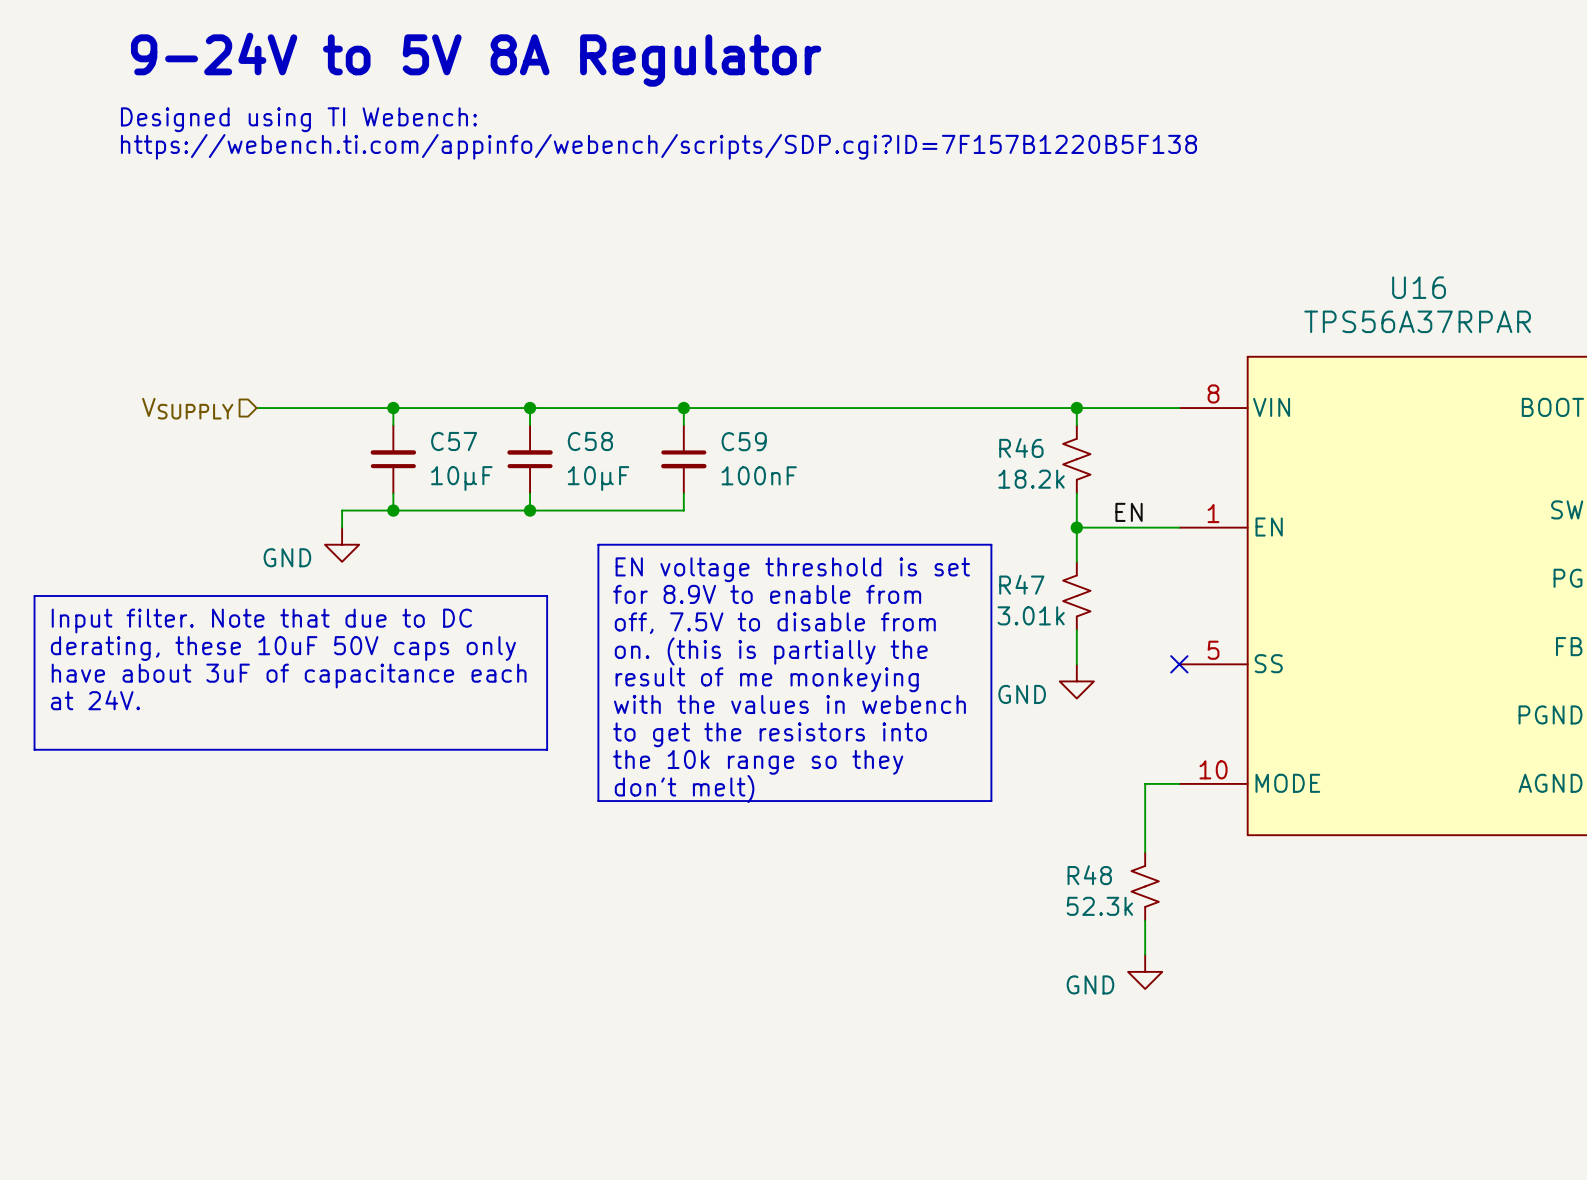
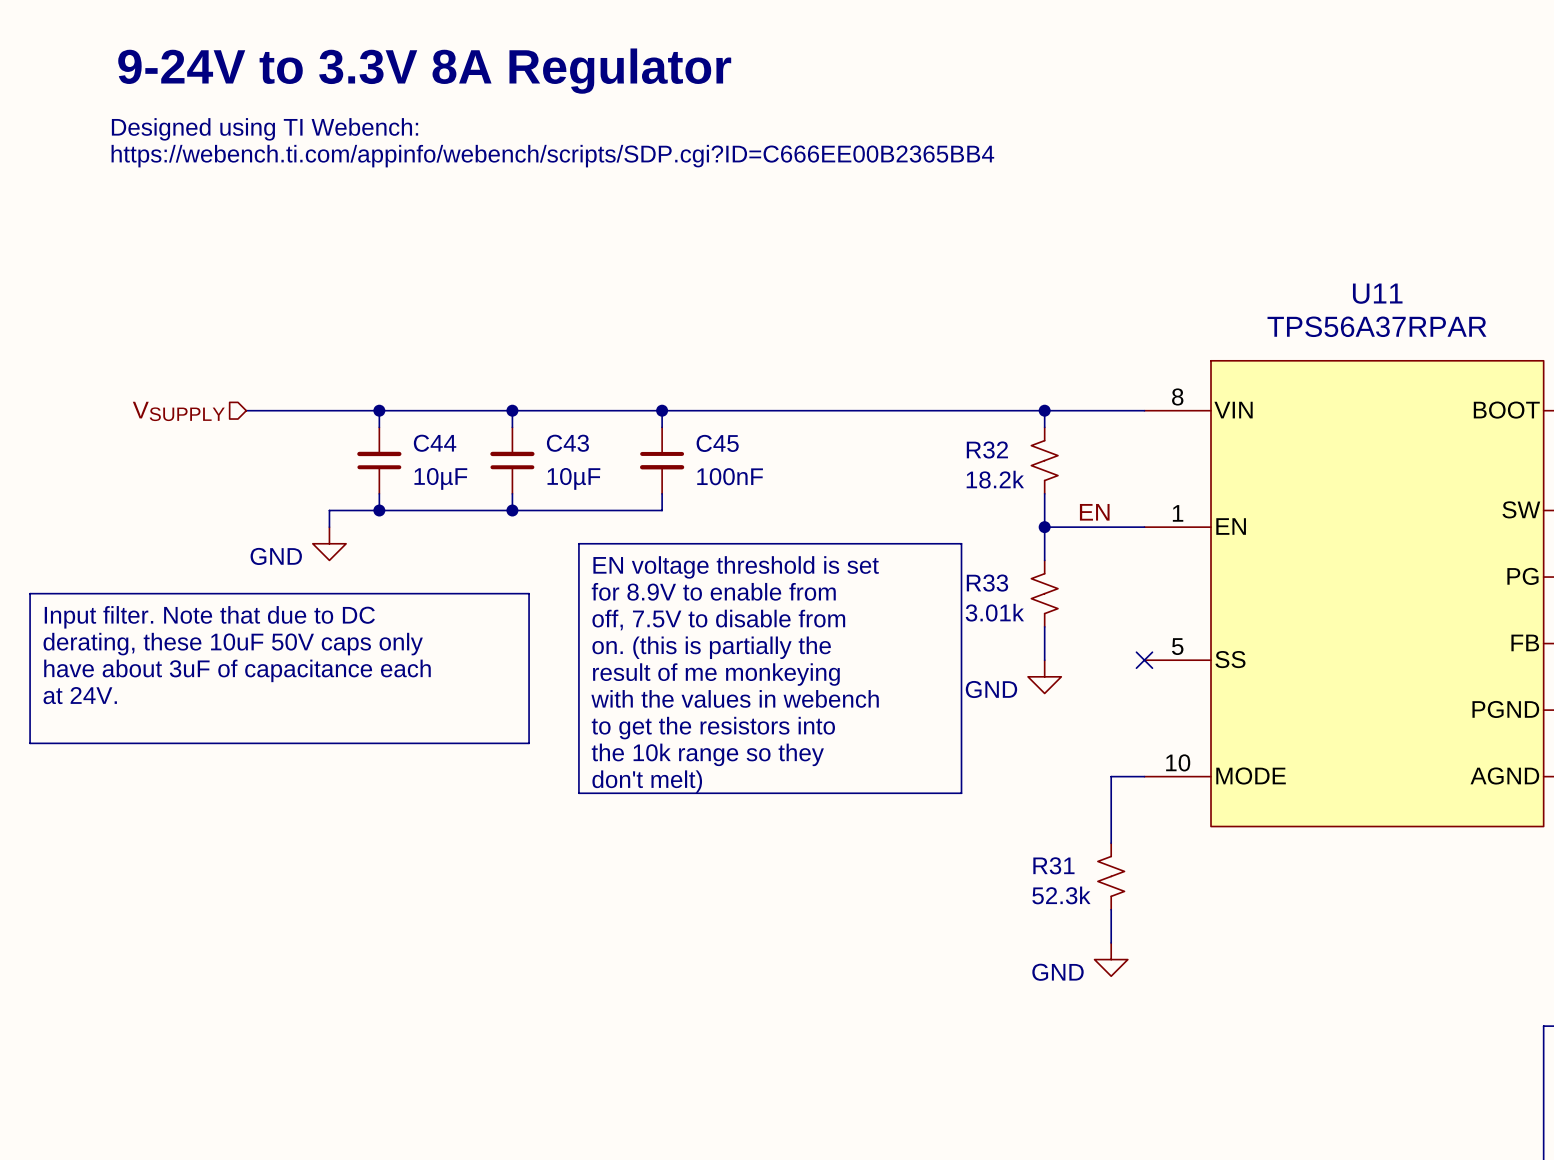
text: 9-24V to 5V 8A Regulator (476, 59) -> 9-24V to 3.3V 8A Regulator (424, 71)
text: https://webench.ti.com/appinfo/webench/scripts/SDP.cgi?ID=7F157B1220B5F138 (658, 146) -> https://webench.ti.com/appinfo/webench/scripts/SDP.cgi?ID=C666EE00B2365BB4 (552, 156)
U16 name: U16 (1419, 287) -> U11 (1377, 293)
C57 name: C57 (454, 441) -> C44 (435, 443)
C58 name: C58 (590, 441) -> C43 (567, 443)
C59 name: C59 (744, 441) -> C45 (717, 443)
R46 name: R46 (1021, 447) -> R32 (987, 449)
R47 name: R47 (1021, 584) -> R33 (987, 583)
R48 name: R48 (1089, 875) -> R31 (1053, 865)

